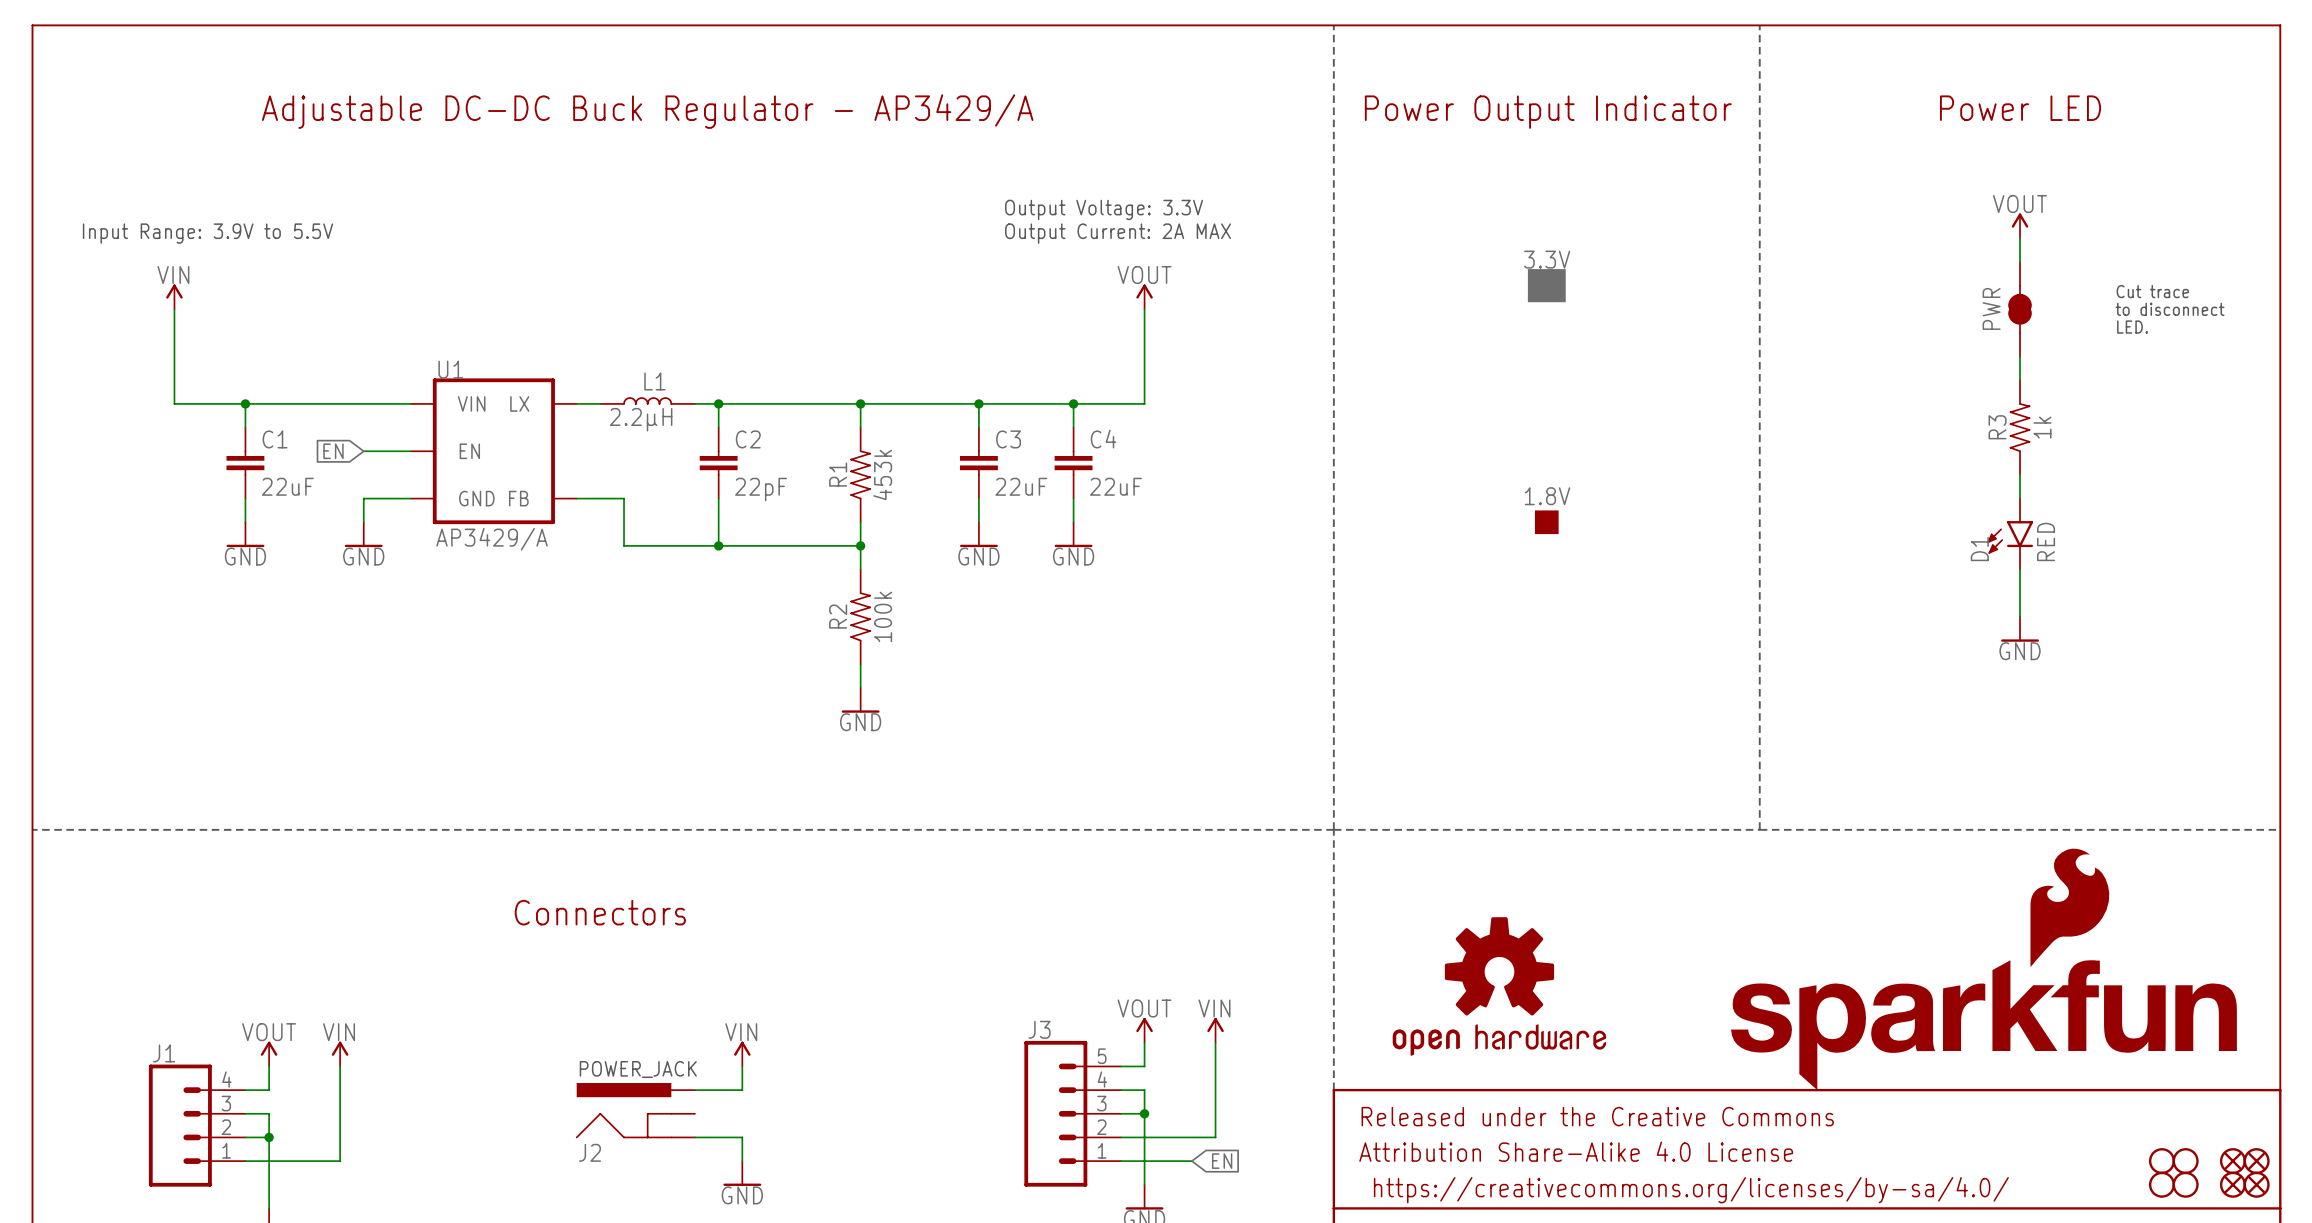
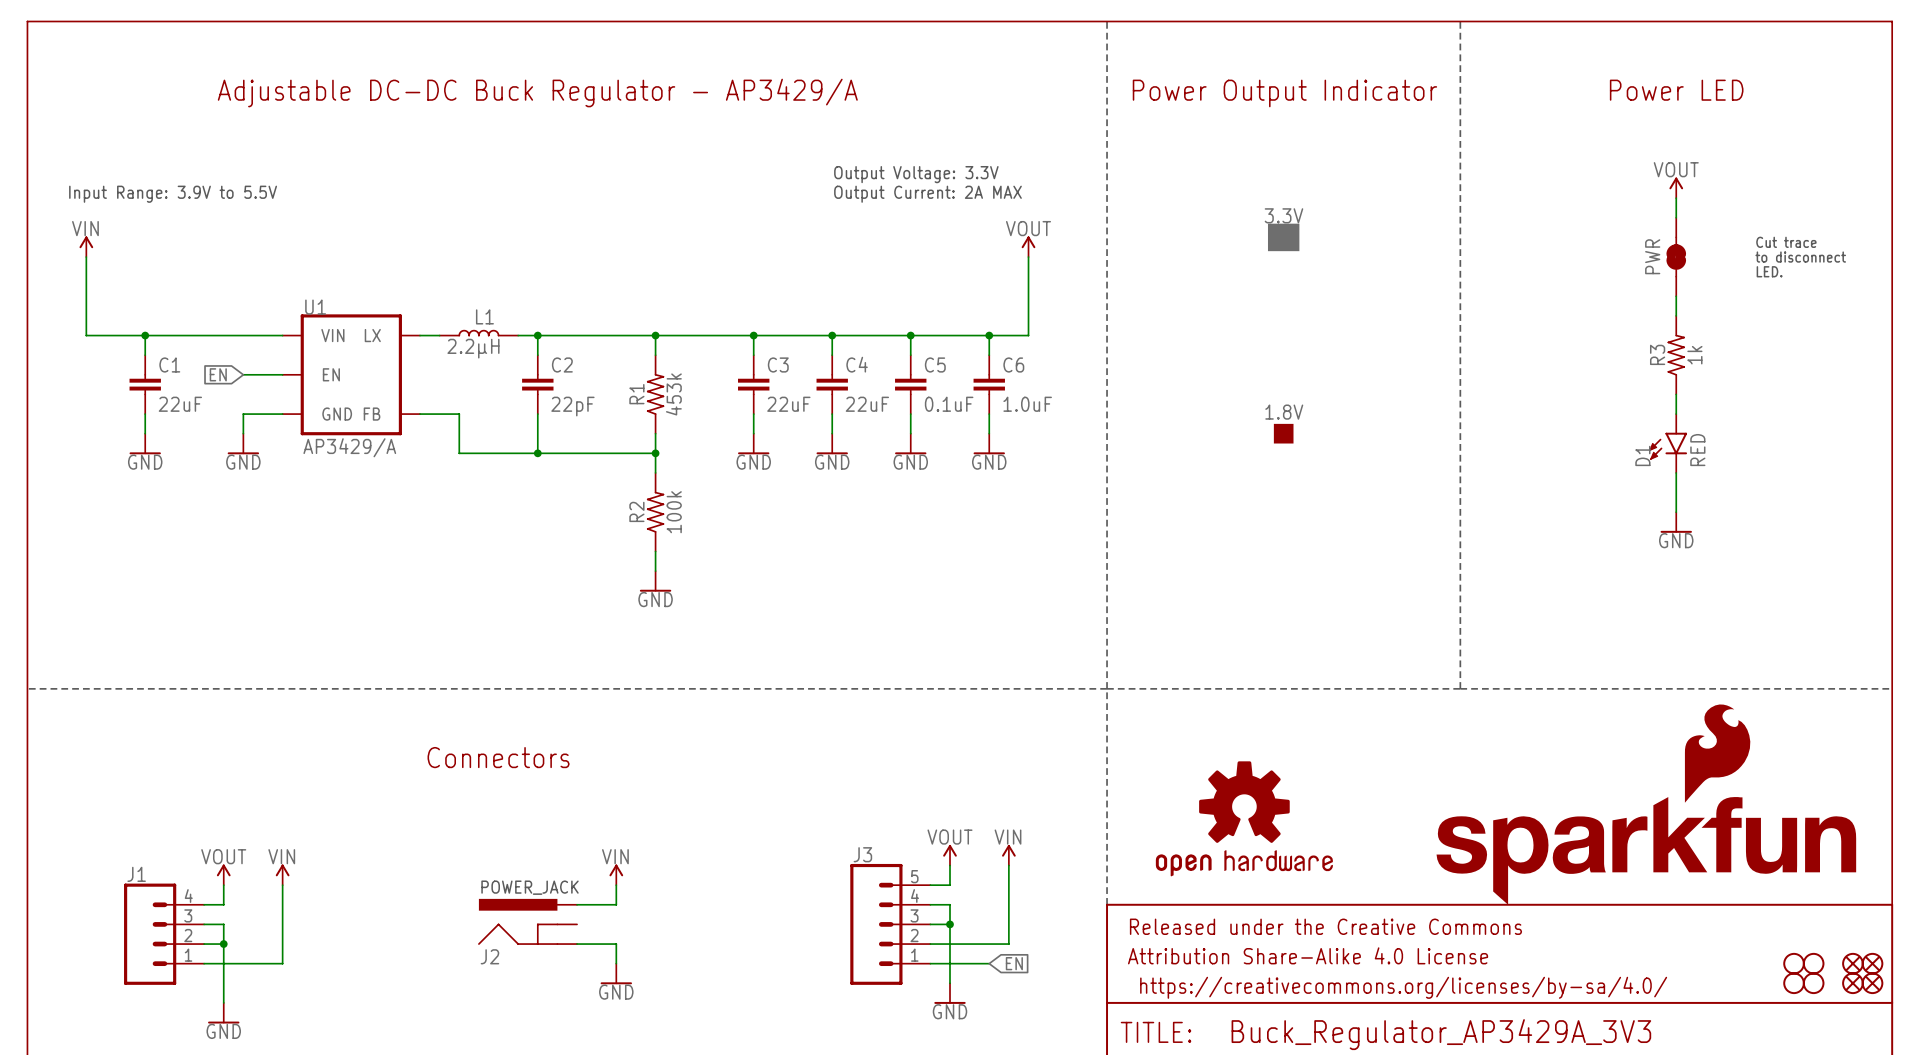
power symbol position: VIN (174, 296) -> VIN (86, 246)
power symbol position: VOUT (1144, 296) -> VOUT (1028, 246)
wire: none -> (86, 257) (86, 335) (145, 335) (145, 355)
wire: (174, 309) (174, 403) -> none
wire: (1144, 309) (1144, 403) -> (1028, 257) (1028, 335) (950, 335)
L1 position: (647, 400) -> (478, 333)
junction: none -> (145, 335)
wire: (245, 403) (245, 427) -> none
junction: (245, 403) -> none
wire: (340, 403) (411, 403) -> none
wire: (576, 403) (600, 403) -> (420, 335) (439, 335)
junction: none -> (537, 335)
wire: (718, 403) (718, 427) -> (537, 335) (537, 355)
junction: (718, 403) -> none
junction: none -> (655, 335)
wire: (860, 403) (860, 427) -> (655, 335) (655, 355)
junction: (860, 403) -> none
junction: none -> (753, 335)
wire: (978, 403) (978, 427) -> (753, 335) (753, 355)
junction position: (978, 403) -> (832, 335)
wire: (1073, 403) (1073, 427) -> (832, 335) (832, 355)
junction position: (1073, 403) -> (910, 335)
wire: none -> (910, 335) (910, 355)
wire: none -> (989, 335) (989, 355)
junction: none -> (989, 335)
global label position: EN (333, 451) -> EN (218, 374)
wire: (363, 451) (411, 451) -> (243, 374) (282, 374)
U1 position: (493, 451) -> (351, 374)
C1 position: (245, 463) -> (145, 384)
C2 position: (718, 463) -> (537, 384)
C3 position: (978, 463) -> (753, 384)
C4 position: (1073, 463) -> (832, 384)
C5: none -> 0.1uF (910, 384)
C6: none -> 1.0uF (989, 384)
R1 position: (860, 474) -> (655, 394)
wire: (245, 498) (245, 522) -> (145, 414) (145, 433)
wire: (411, 498) (363, 498) (363, 522) -> (282, 414) (243, 414) (243, 433)
wire: (576, 498) (624, 498) (624, 545) -> (420, 414) (459, 414) (459, 453) (518, 453)
wire: (718, 498) (718, 545) -> (537, 414) (537, 453)
wire: (978, 498) (978, 522) -> (753, 414) (753, 433)
wire: (1073, 498) (1073, 522) -> (832, 414) (832, 433)
wire: none -> (910, 414) (910, 433)
wire: none -> (989, 414) (989, 433)
wire: (860, 522) (860, 569) -> (655, 433) (655, 472)
power symbol: none -> GND (145, 444)
power symbol: GND (245, 534) -> none
power symbol: none -> GND (243, 444)
power symbol: GND (363, 534) -> none
power symbol: none -> GND (753, 444)
power symbol position: GND (978, 534) -> GND (832, 444)
power symbol position: GND (1073, 534) -> GND (910, 444)
power symbol: none -> GND (989, 444)
junction: none -> (537, 453)
junction: (718, 545) -> none
wire: (789, 545) (860, 545) -> (518, 335) (577, 335)
junction: none -> (655, 453)
junction: (860, 545) -> none
R2 position: (860, 616) -> (655, 512)
wire: (860, 664) (860, 687) -> (655, 551) (655, 571)
power symbol position: GND (860, 700) -> GND (655, 581)

